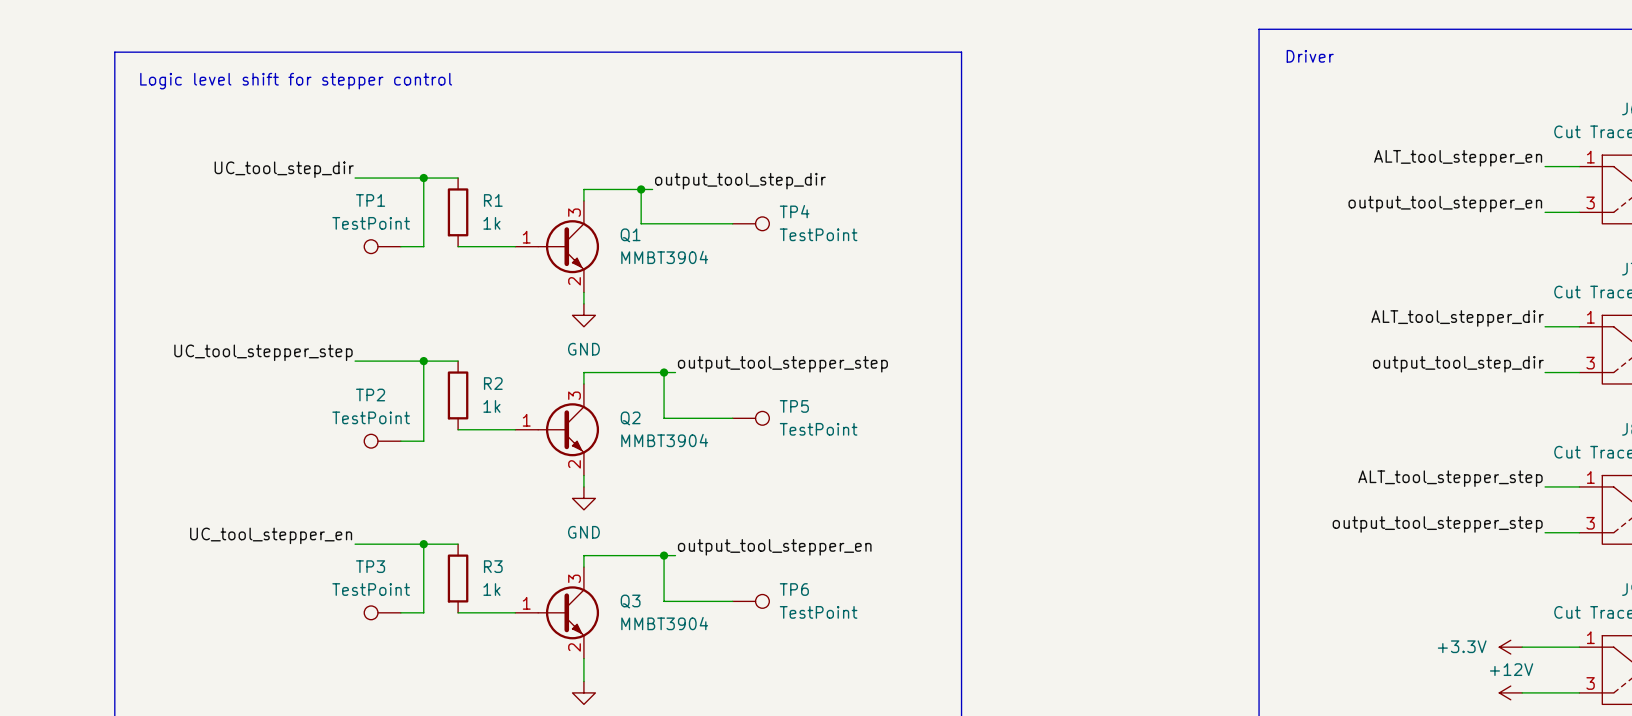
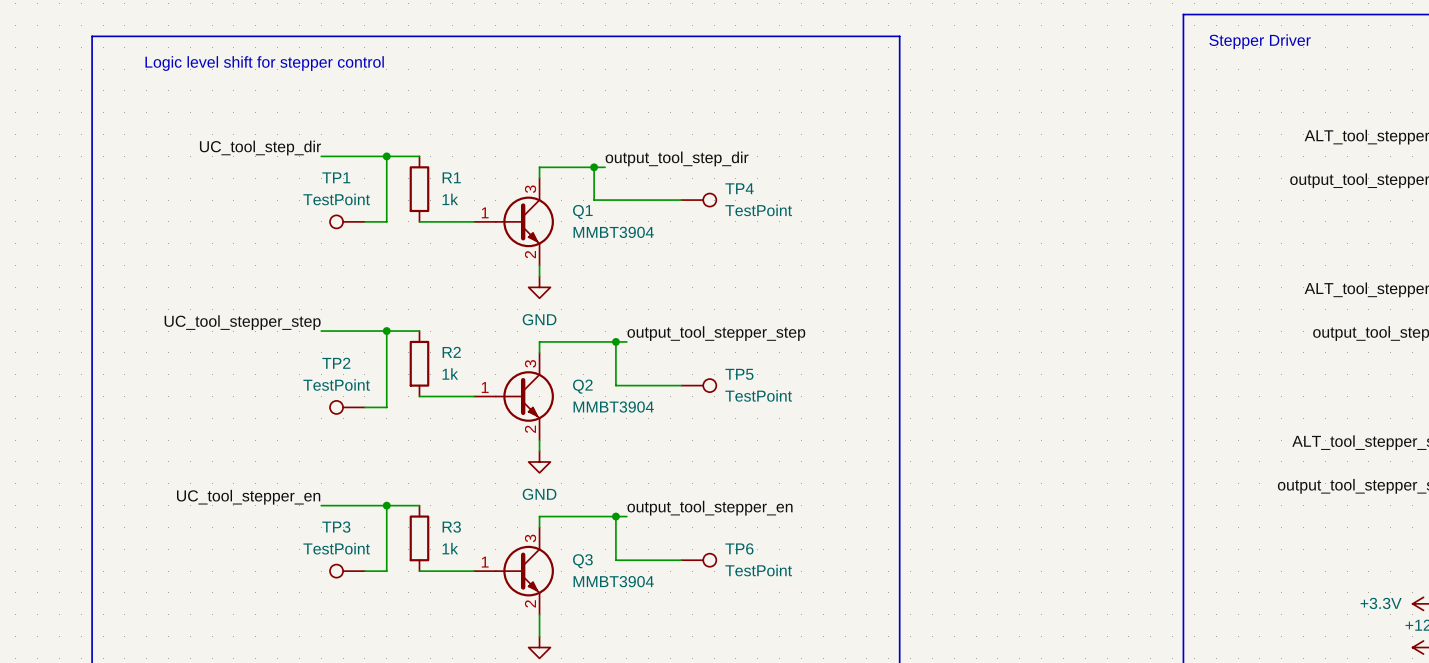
text: Driver (1310, 56) -> none
text: none -> Stepper Driver (1260, 41)

